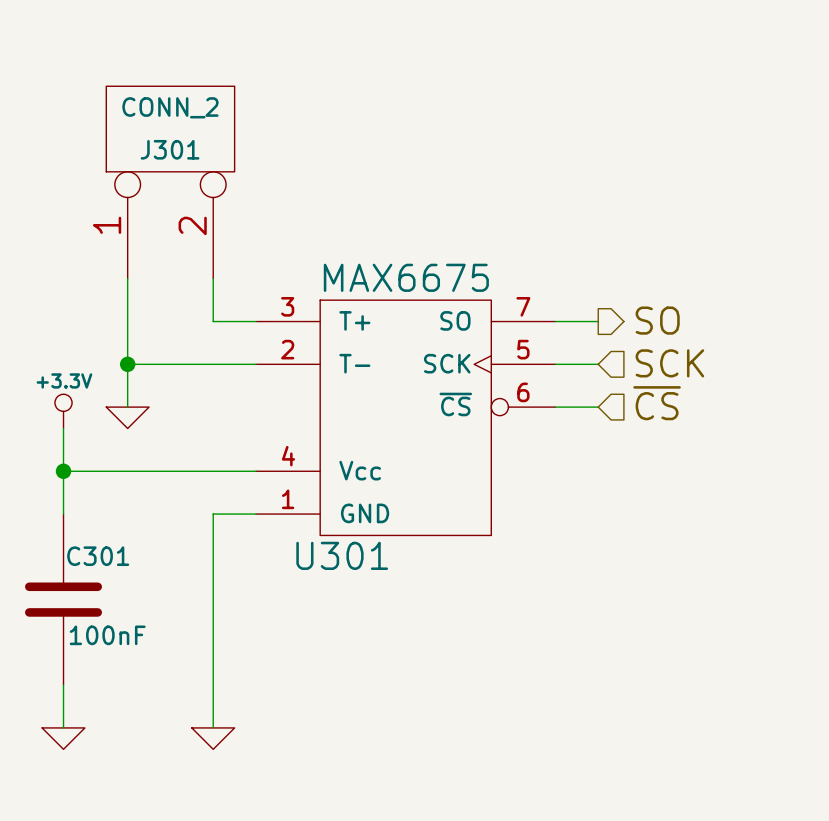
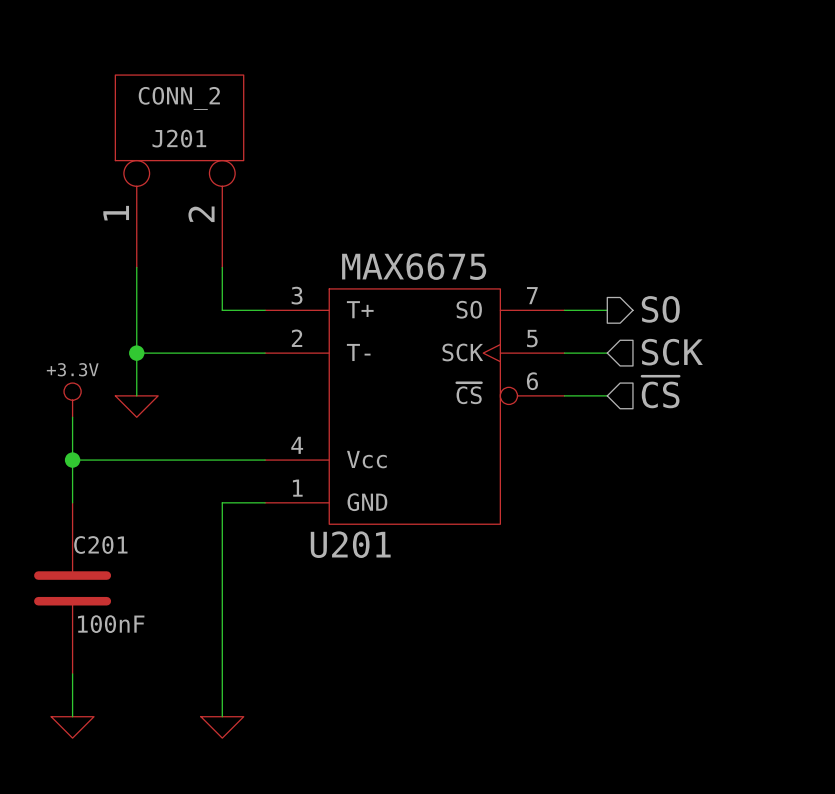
J301 name: J301 (170, 149) -> J201 (179, 138)
U301 name: U301 (342, 555) -> U201 (350, 544)
C301 name: C301 (98, 556) -> C201 (100, 544)

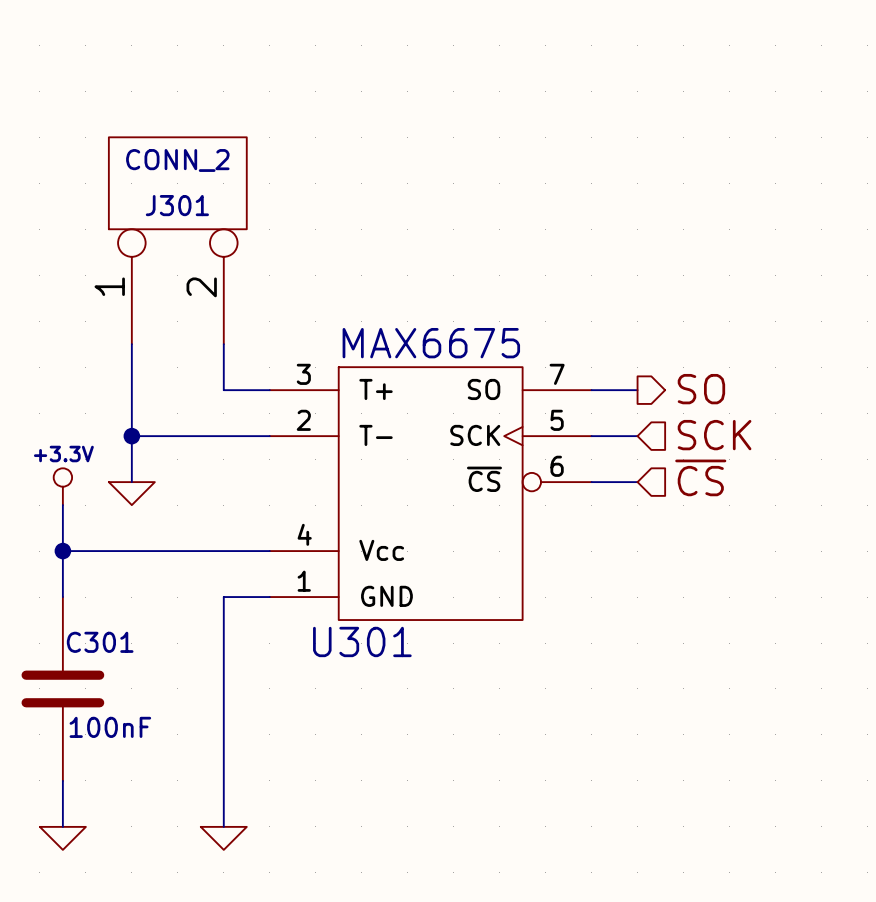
J201 name: J201 (179, 138) -> J301 (177, 205)
C201 name: C201 (100, 544) -> C301 (100, 642)
U201 name: U201 (350, 544) -> U301 (362, 641)

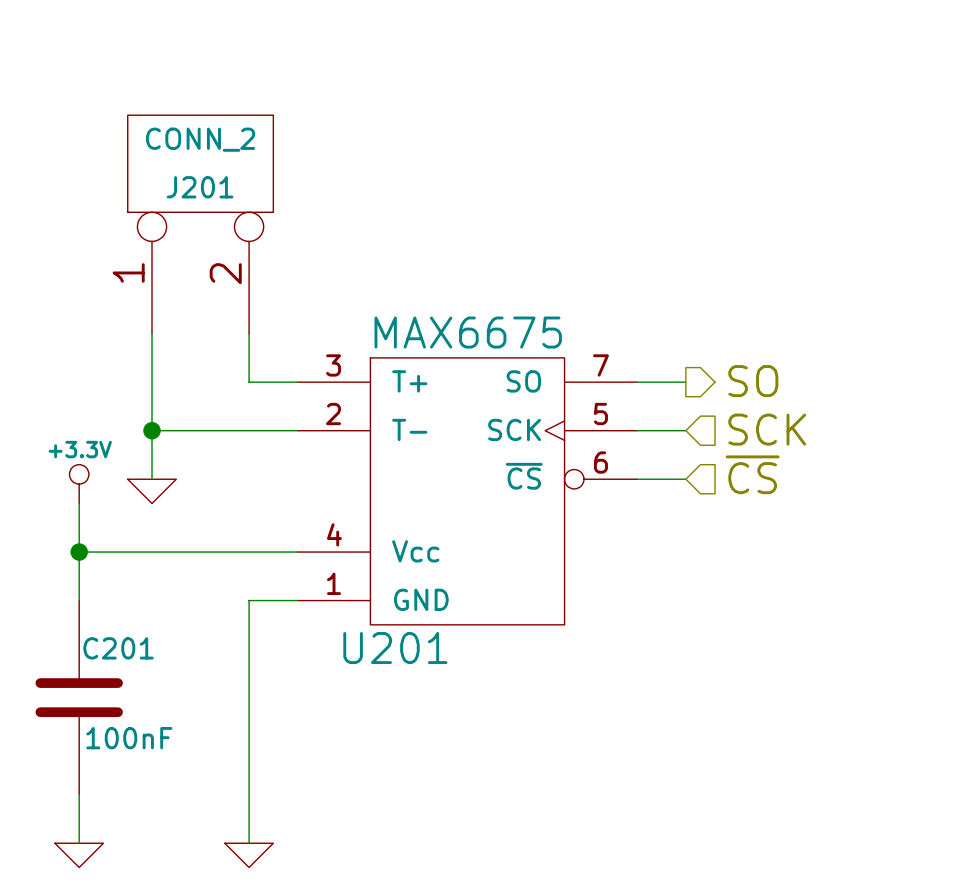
J301 name: J301 (177, 205) -> J201 (200, 187)
U301 name: U301 (362, 641) -> U201 (395, 648)
C301 name: C301 (100, 642) -> C201 (118, 648)

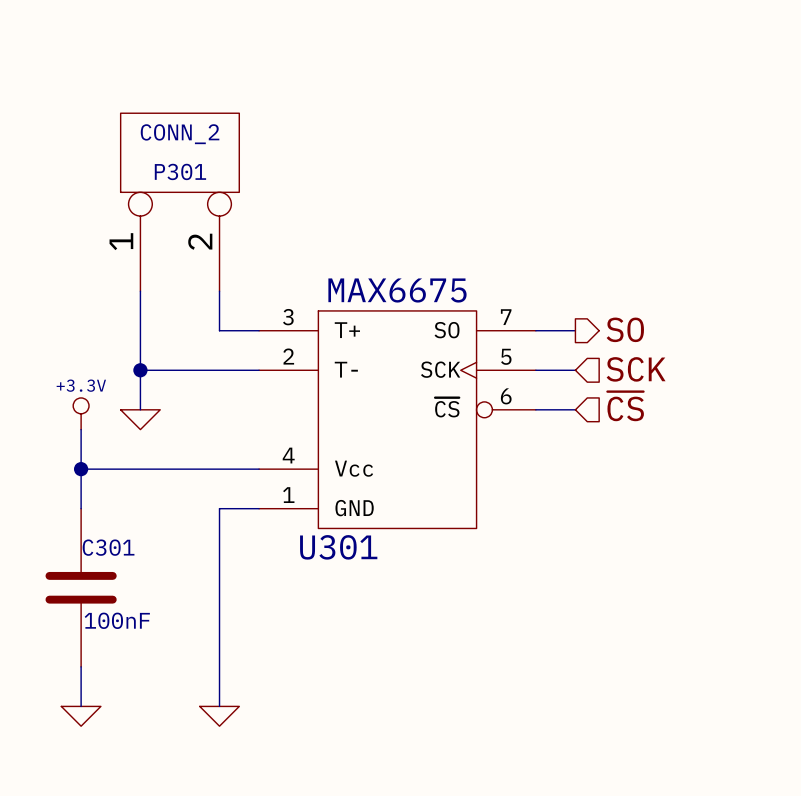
J201 name: J201 (200, 187) -> P301 (180, 171)
C201 name: C201 (118, 648) -> C301 (108, 547)
U201 name: U201 (395, 648) -> U301 (338, 547)

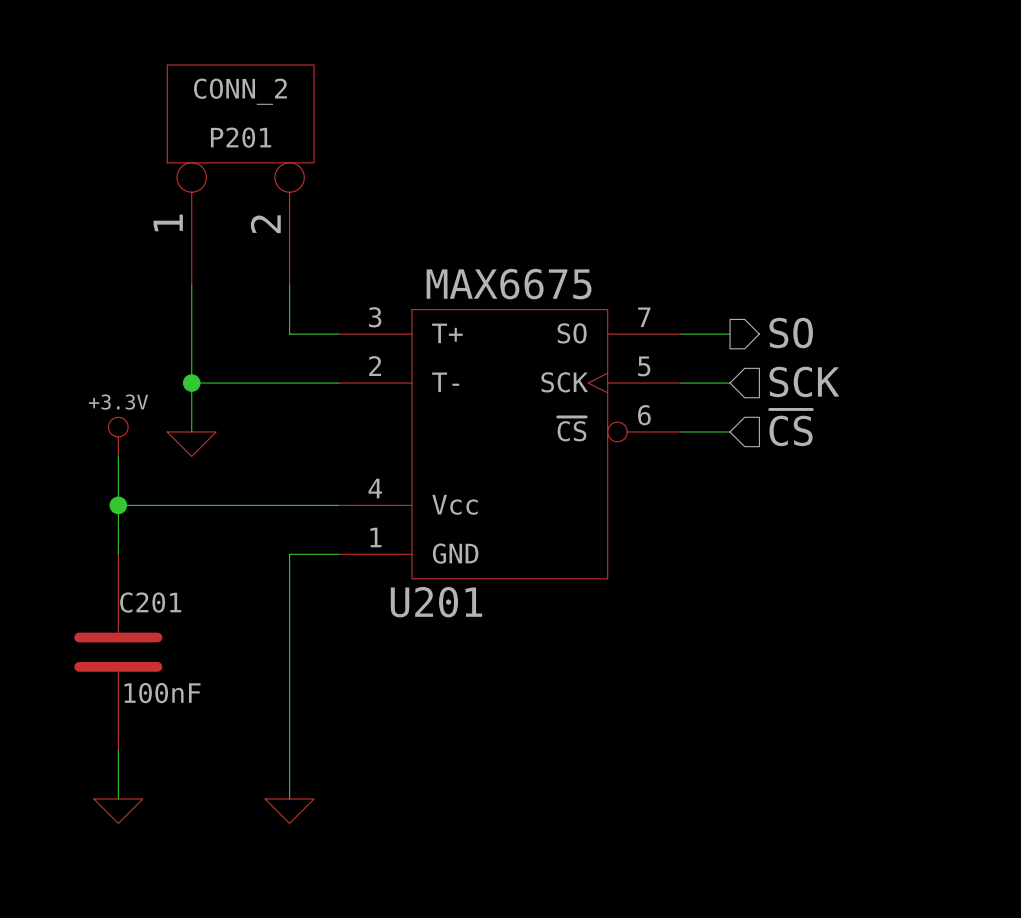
P301 name: P301 (180, 171) -> P201 (241, 137)
C301 name: C301 (108, 547) -> C201 (150, 602)
U301 name: U301 (338, 547) -> U201 (436, 602)

